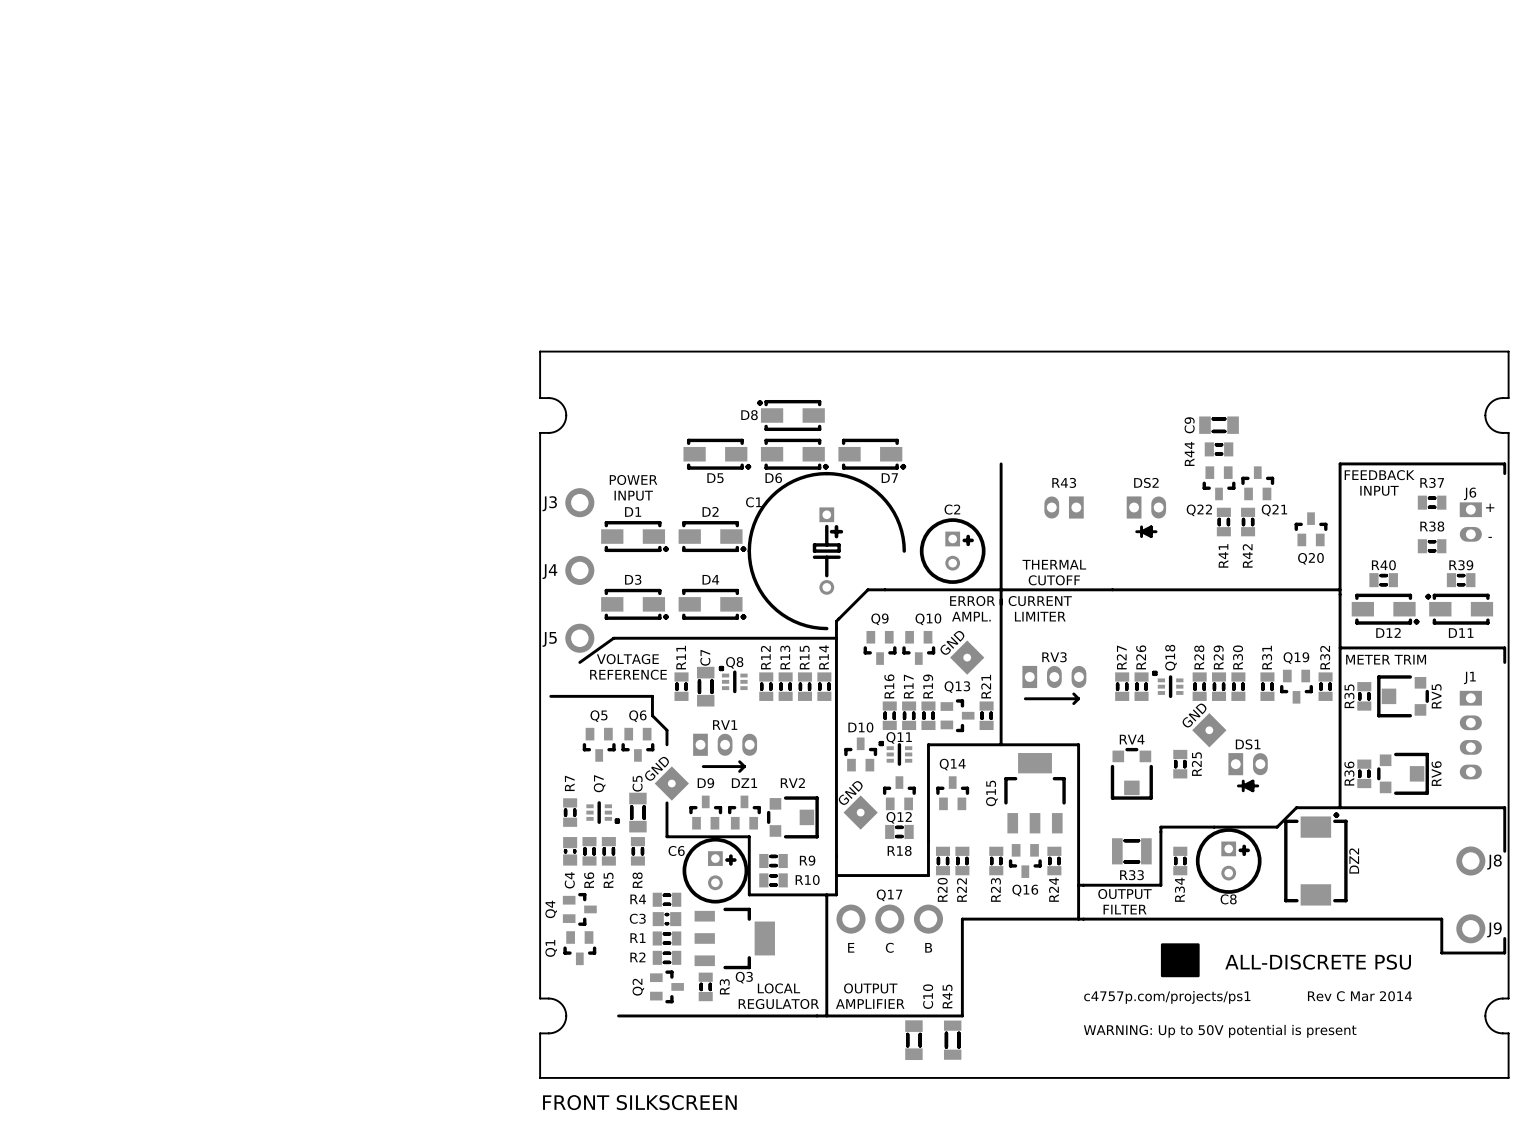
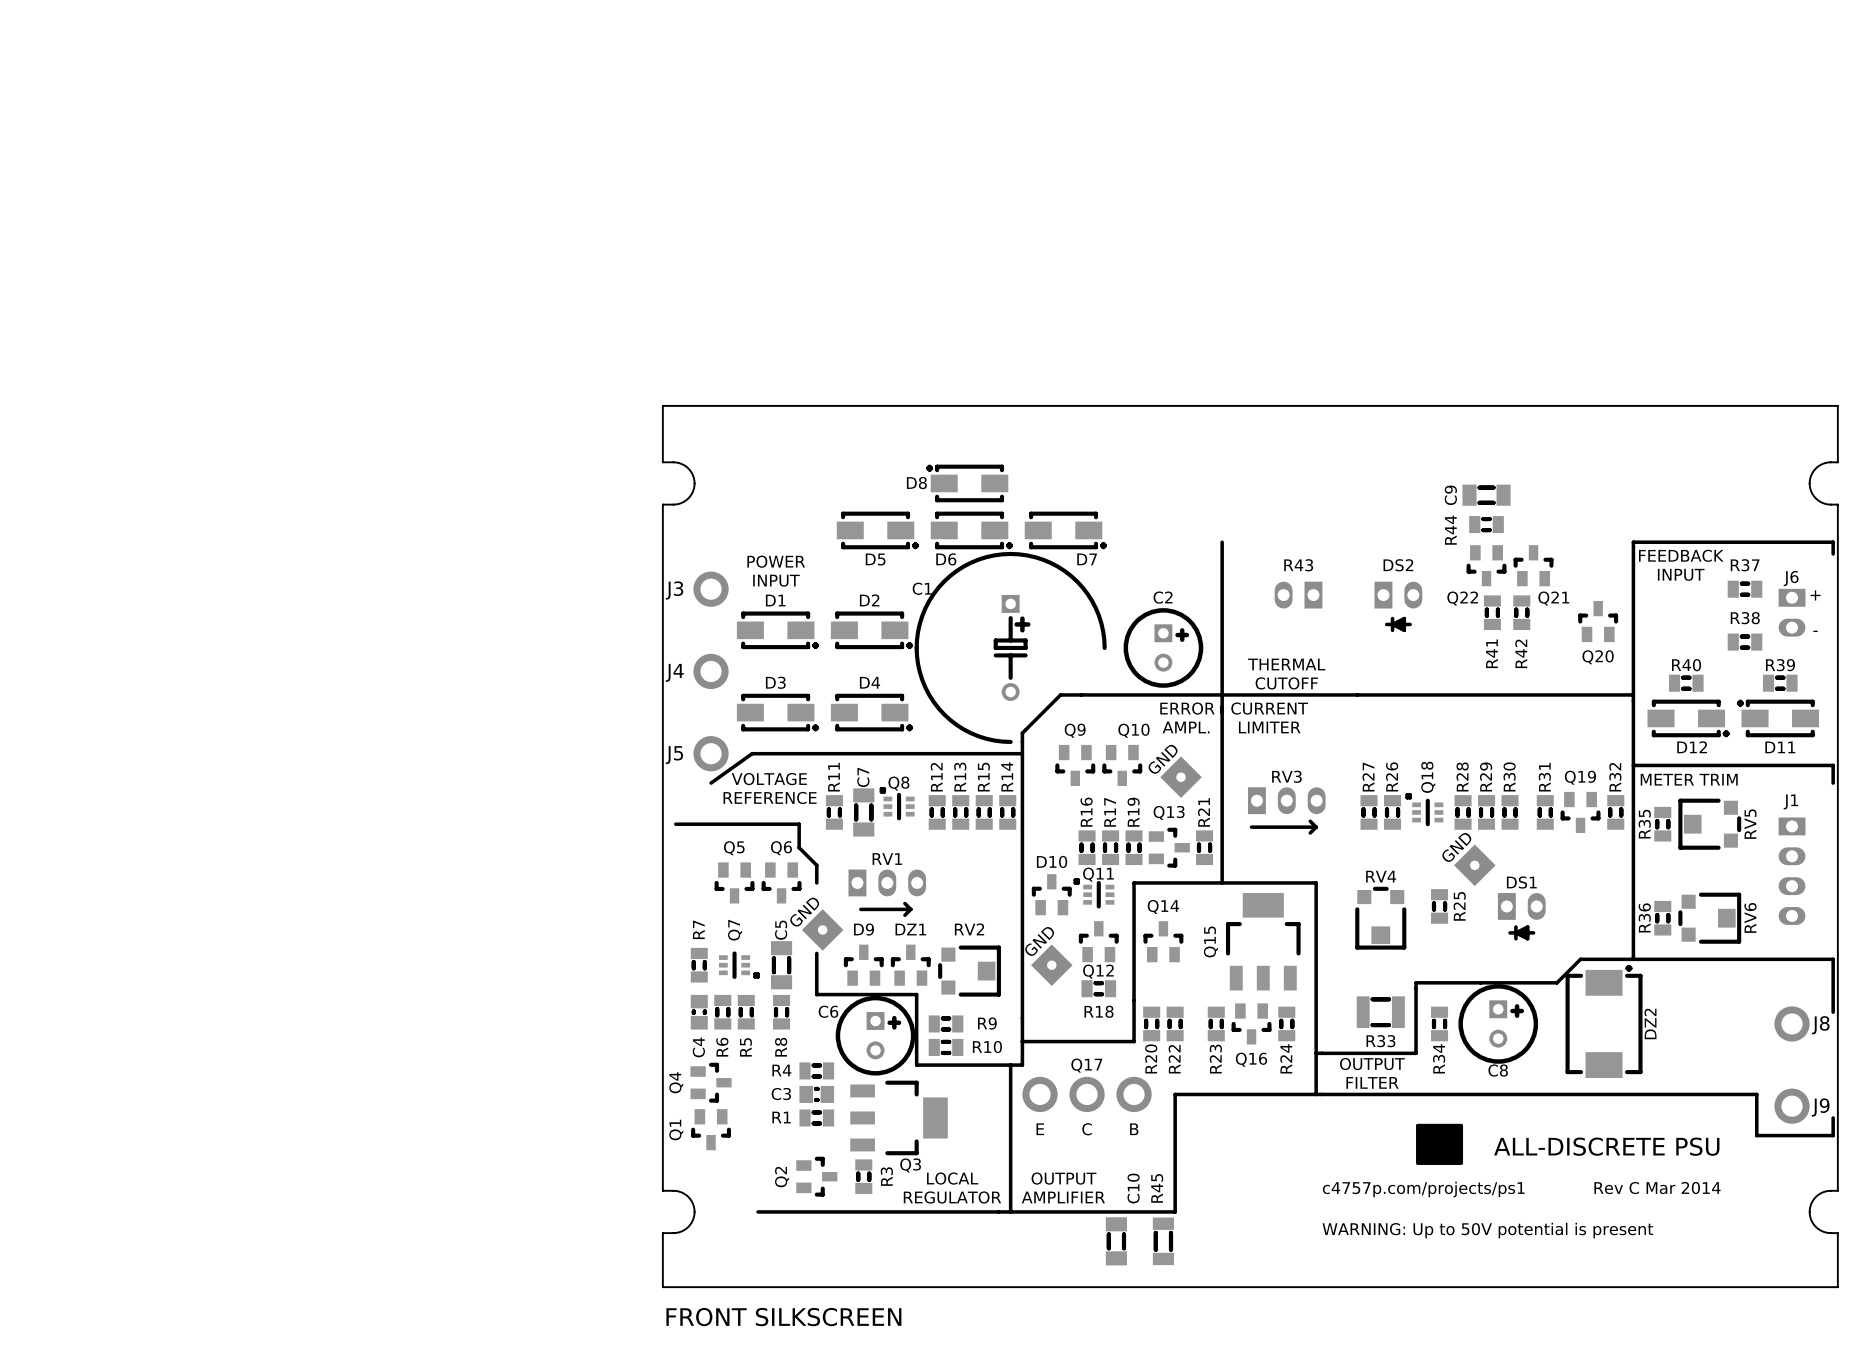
R2: (666, 957) -> none

